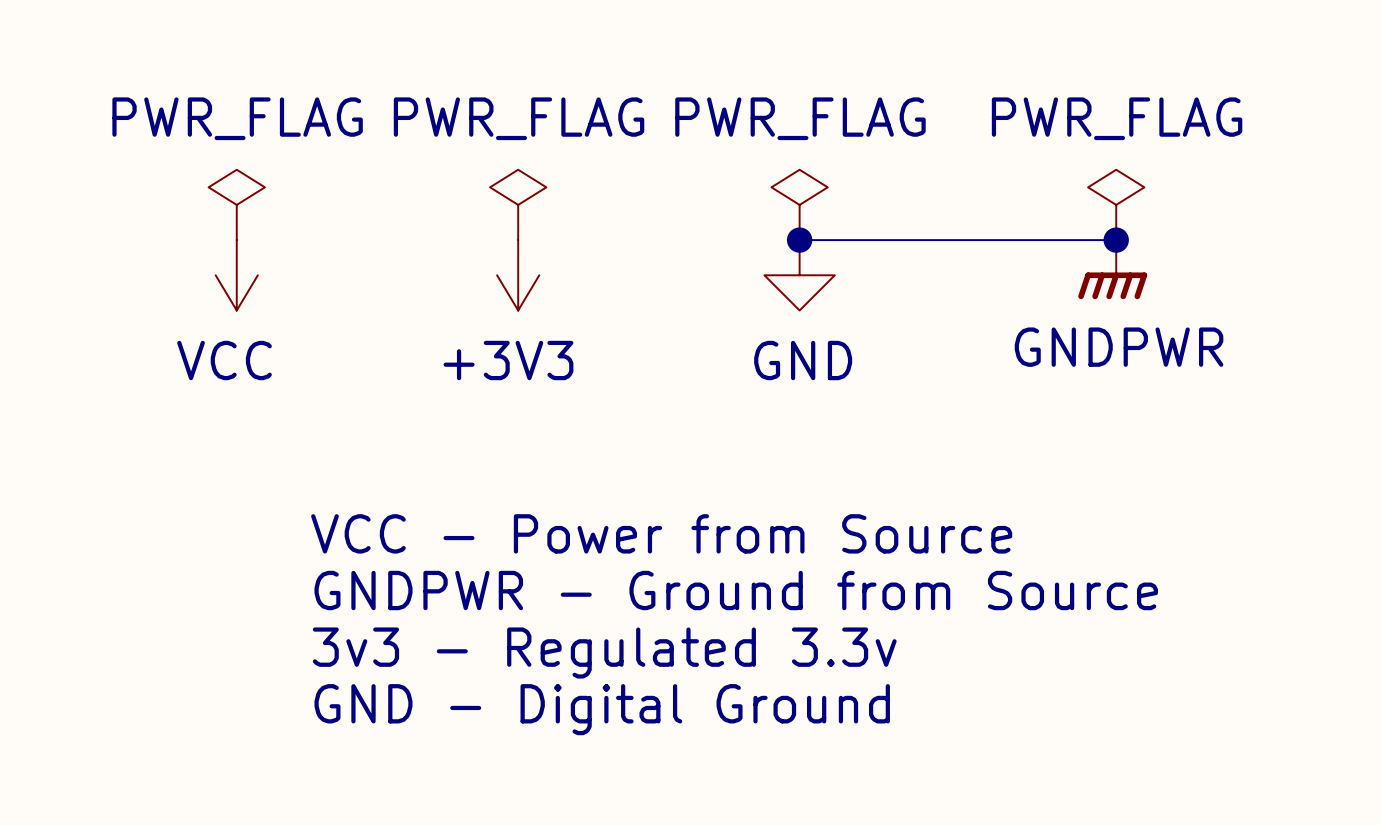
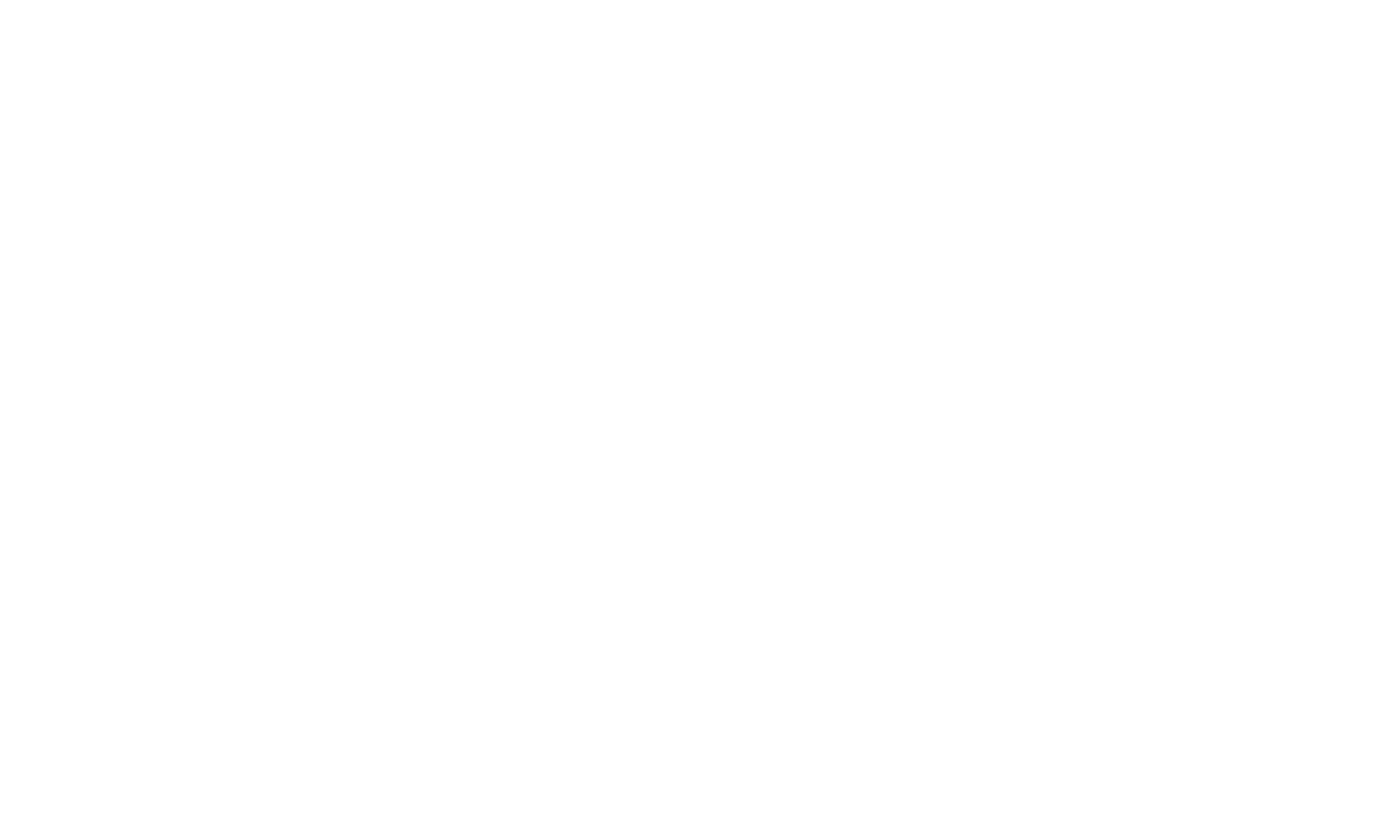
power symbol: PWR_FLAG (236, 204) -> none
power symbol: PWR_FLAG (518, 204) -> none
power symbol: PWR_FLAG (799, 204) -> none
power symbol: PWR_FLAG (1116, 204) -> none
wire: (799, 240) (1116, 240) -> none
junction: (799, 240) -> none
junction: (1116, 240) -> none
power symbol: GNDPWR (1112, 269) -> none
power symbol: VCC (236, 275) -> none
power symbol: +3V3 (518, 275) -> none
power symbol: GND (799, 275) -> none
text: VCC - Power from Source (661, 533) -> none
text: GNDPWR - Ground from Source (736, 590) -> none
text: 3v3 - Regulated 3.3v (604, 653) -> none
text: GND - Digital Ground (602, 709) -> none

